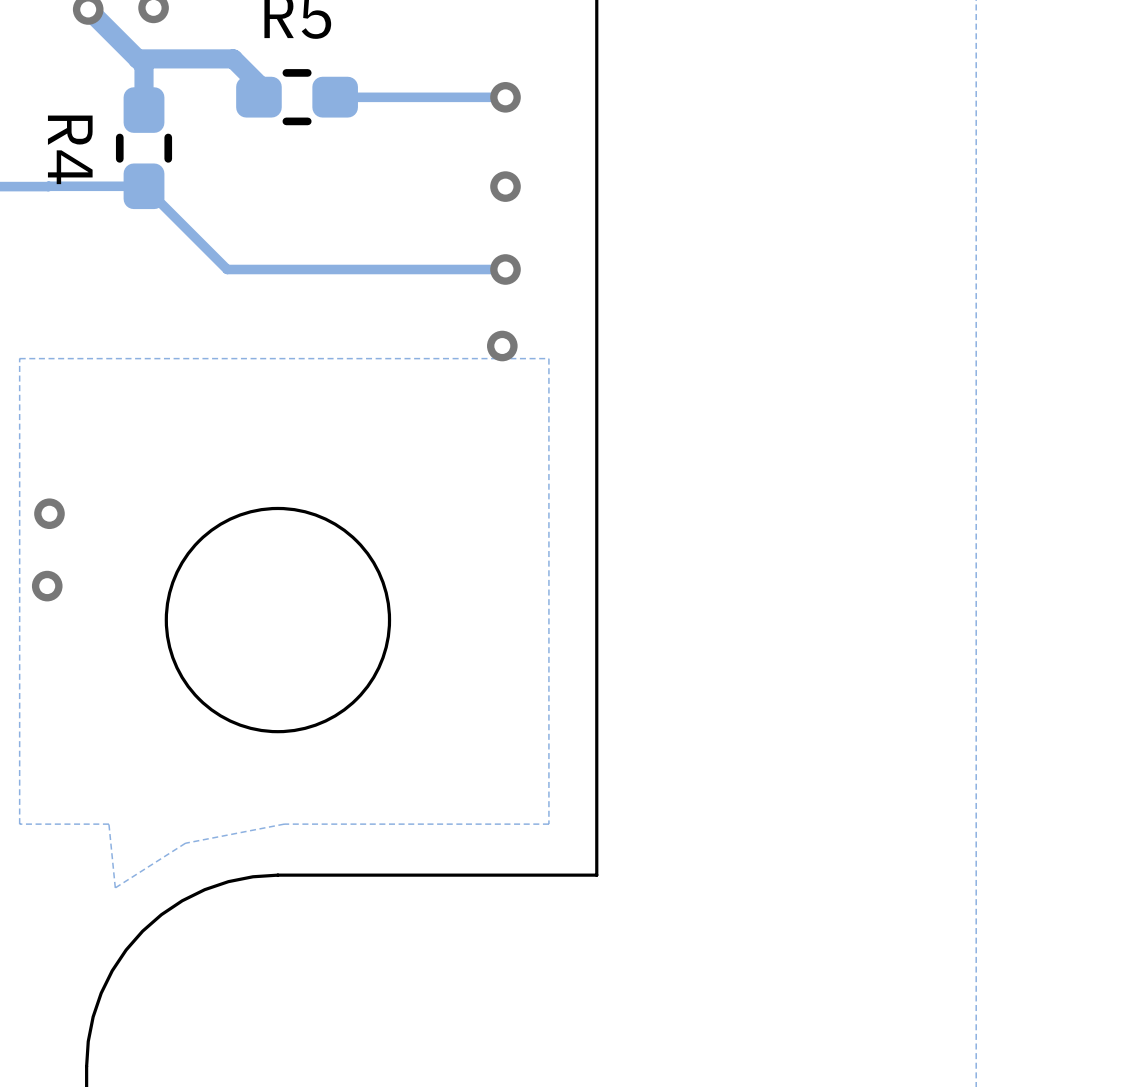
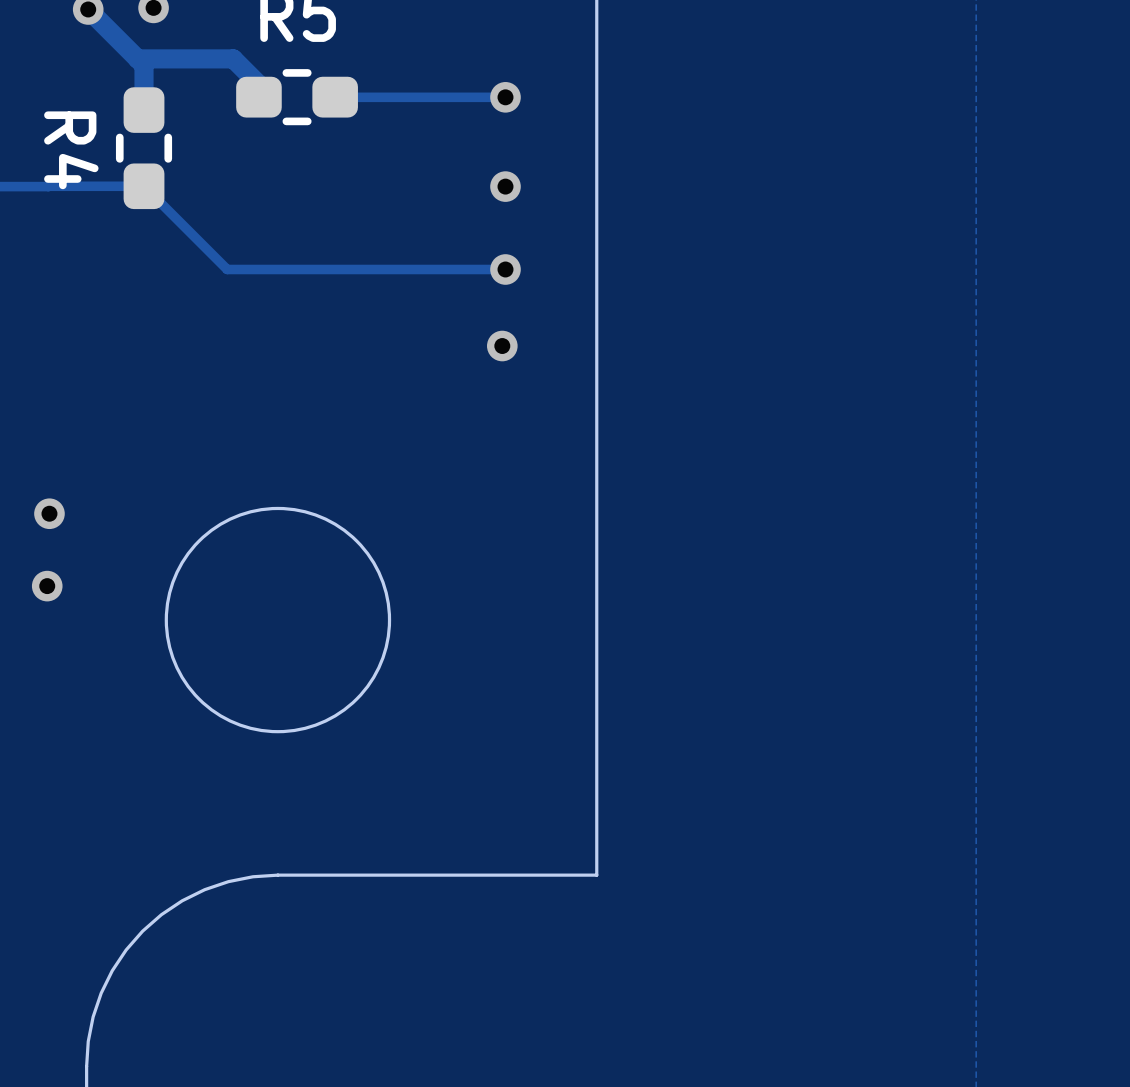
zone outline: (548, 358) (19, 358) (19, 824) (108, 824) (115, 887) (185, 843) (284, 824) (548, 824) (548, 358) -> none

